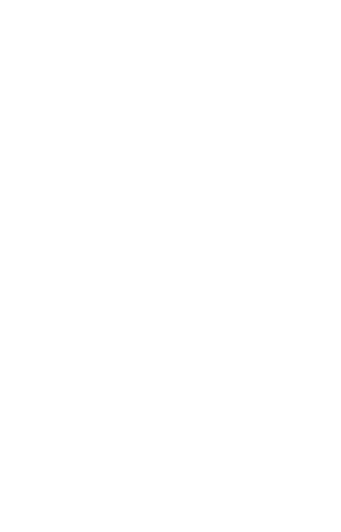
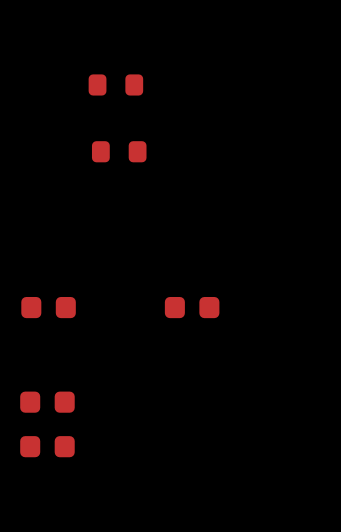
part: none -> (115, 84)
part: none -> (119, 151)
part: none -> (48, 307)
part: none -> (192, 307)
part: none -> (47, 402)
part: none -> (47, 446)

